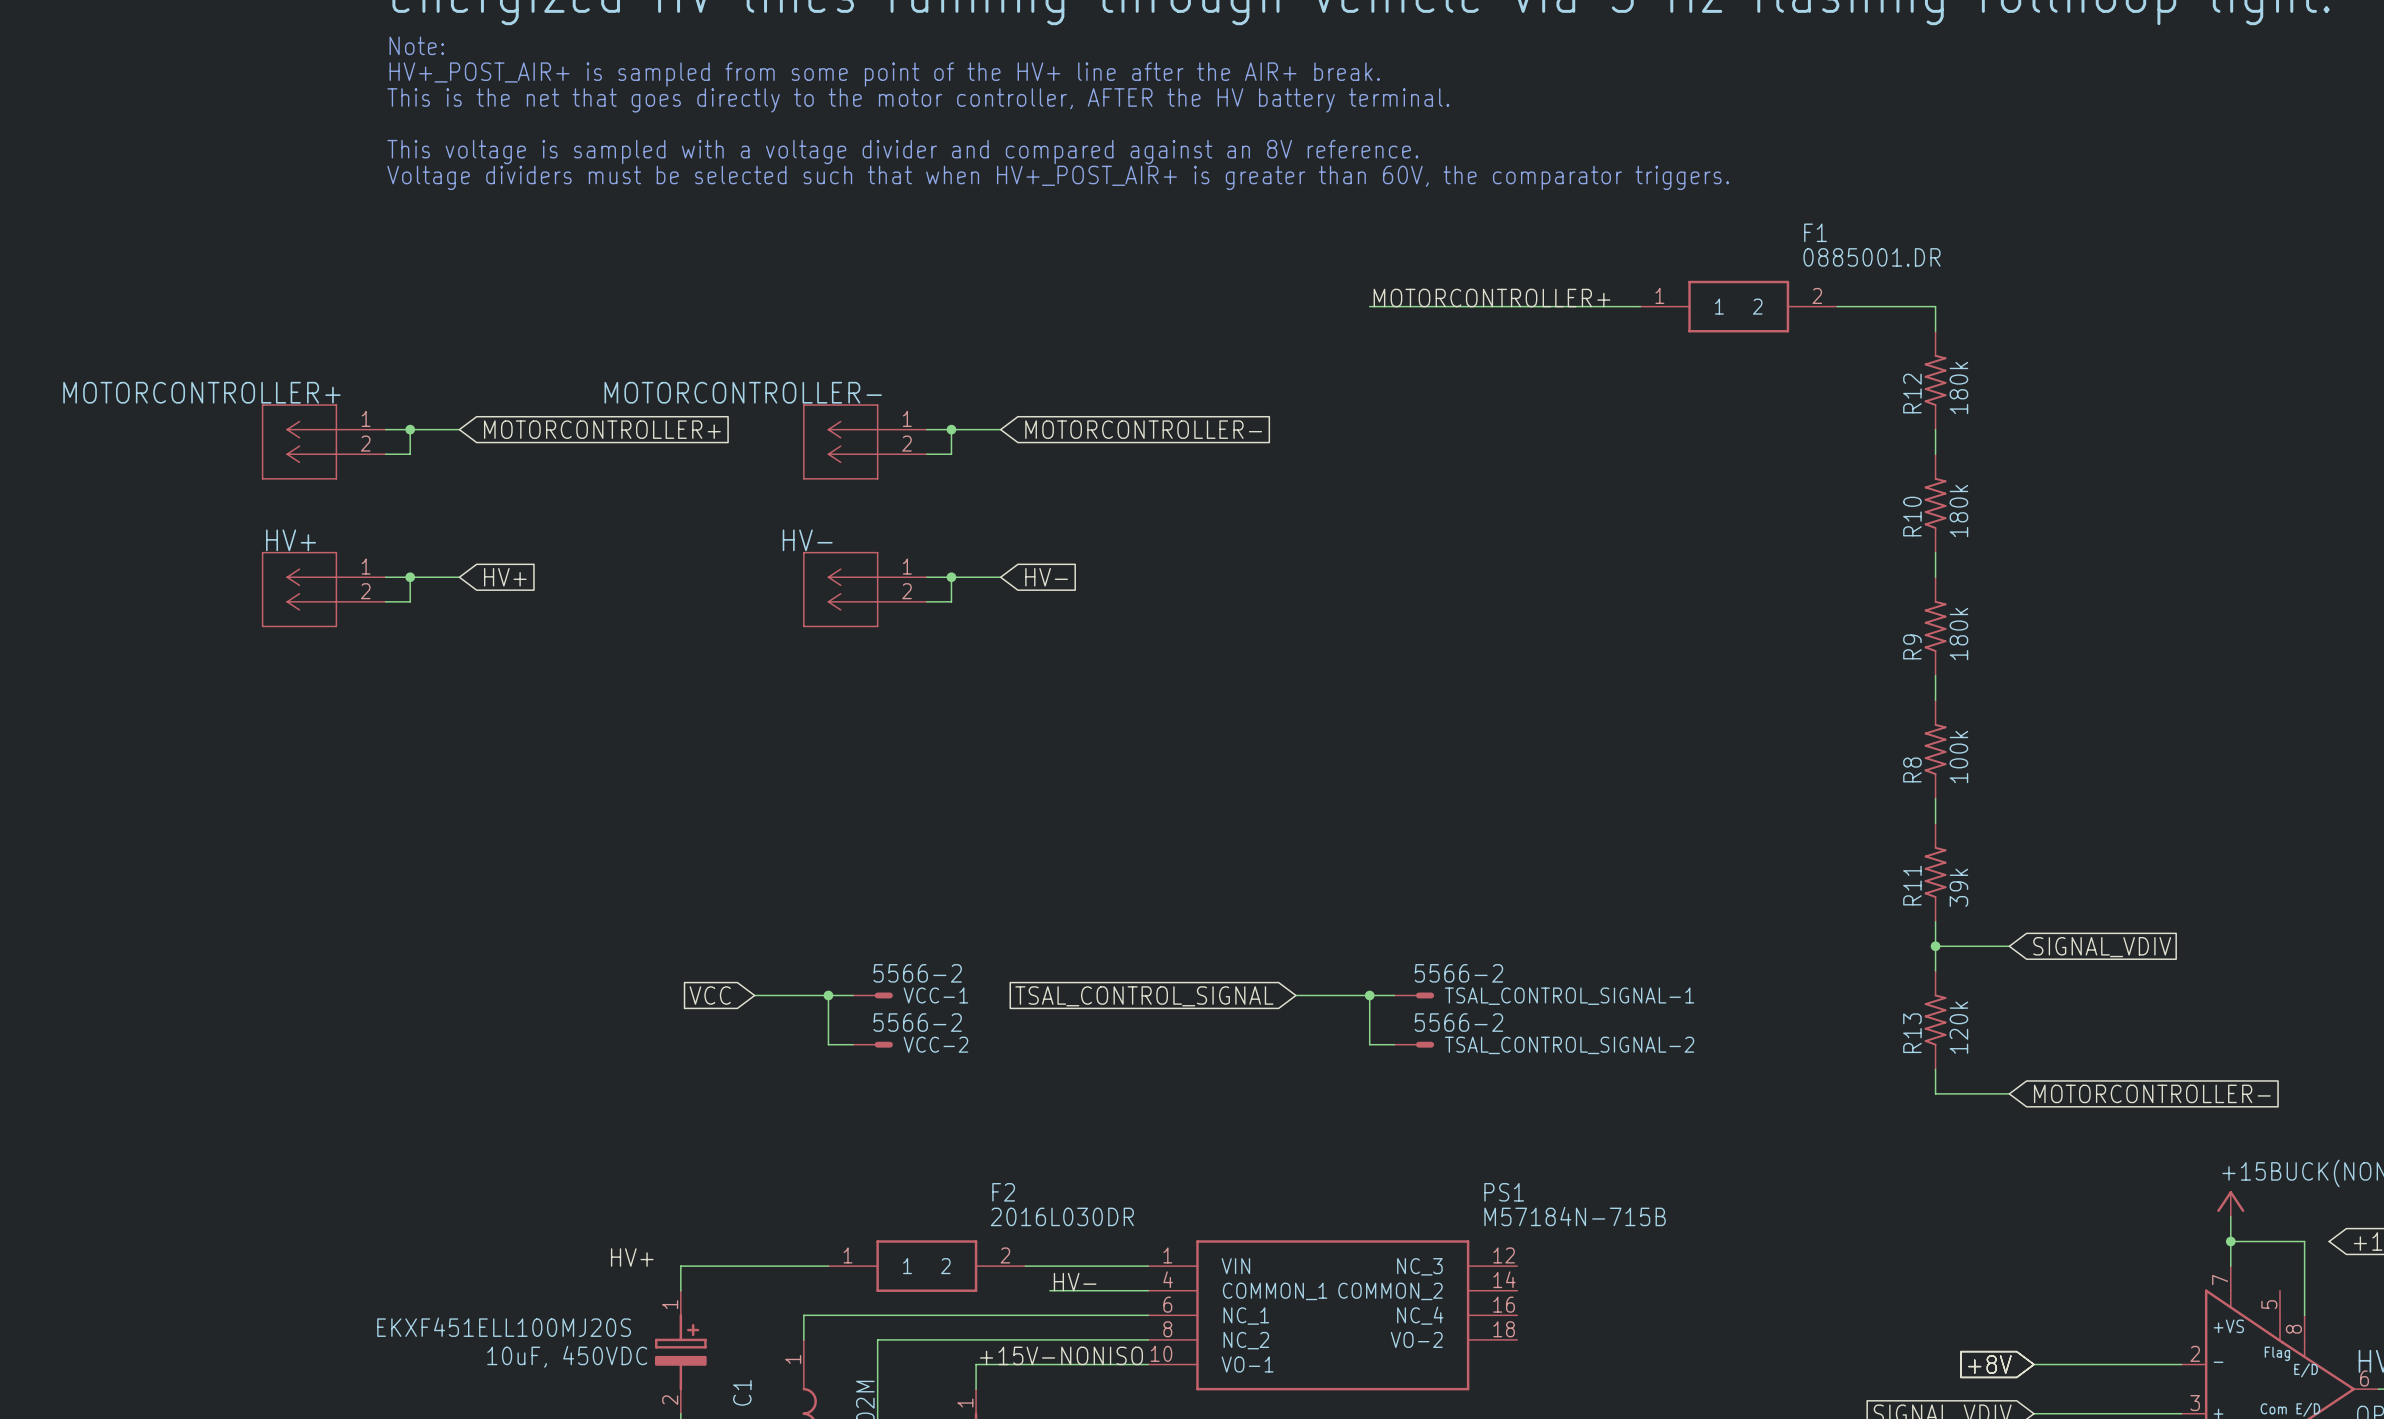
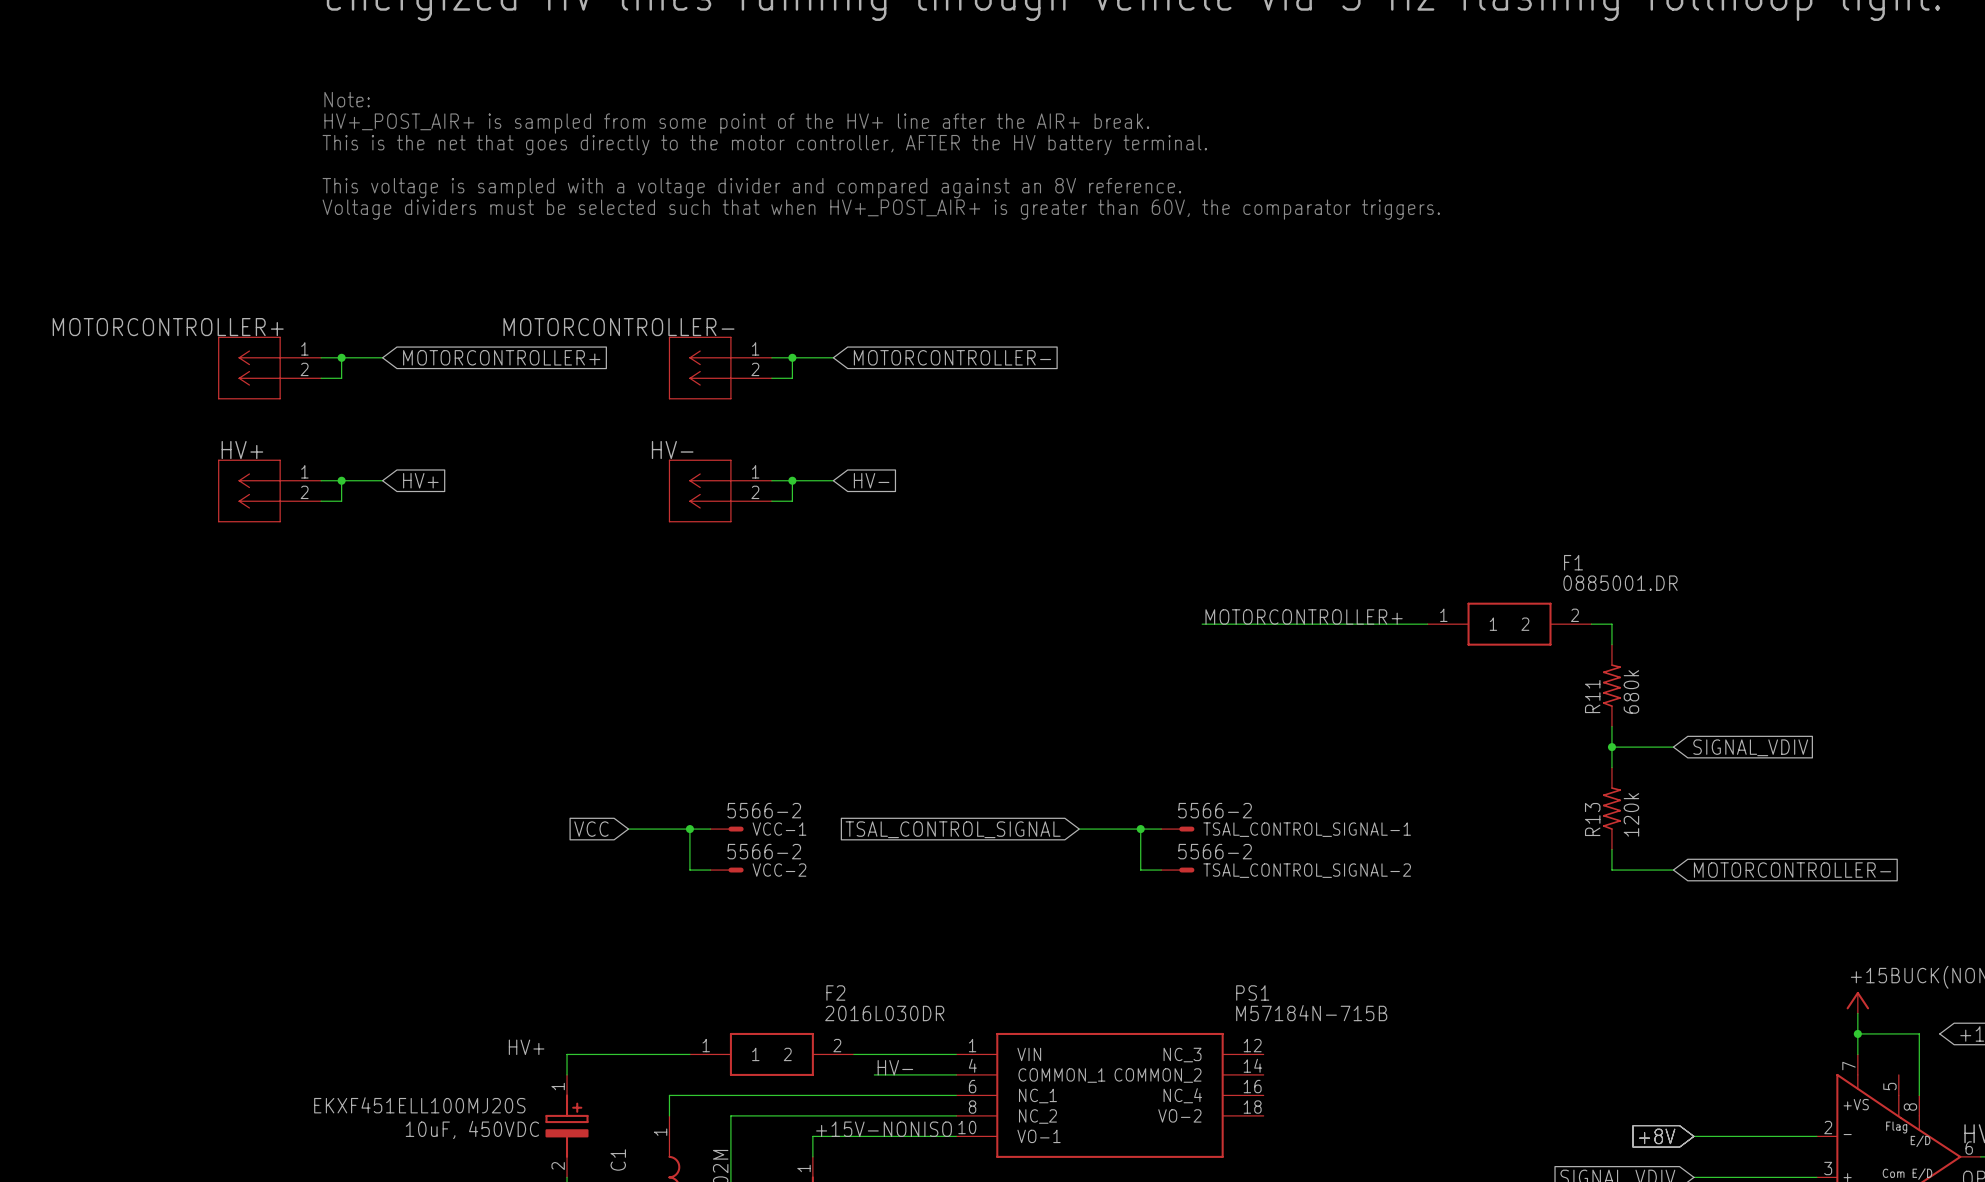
text position: Note: (416, 45) -> Note: (347, 99)
text position: HV+_POST_AIR+ is sampled from some point of the HV+ line after the AIR+ break. (884, 74) -> HV+_POST_AIR+ is sampled from some point of the HV+ line after the AIR+ break. (736, 123)
text position: This is the net that goes directly to the motor controller, AFTER the HV battery terminal. (918, 100) -> This is the net that goes directly to the motor controller, AFTER the HV battery terminal. (764, 145)
text position: This voltage is sampled with a voltage divider and compared against an 8V reference. (902, 152) -> This voltage is sampled with a voltage divider and compared against an 8V reference. (751, 188)
text position: Voltage dividers must be selected such that when HV+_POST_AIR+ is greater than 60V, the comparator triggers. (1058, 177) -> Voltage dividers must be selected such that when HV+_POST_AIR+ is greater than 60V, the comparator triggers. (881, 209)
label: MOTORCONTROLLER+ (1492, 298) -> none
wire: (1369, 306) (1640, 306) -> none
F1 position: (1738, 306) -> (1509, 624)
wire: (1837, 306) (1935, 306) (1935, 331) -> none
R12: 180k (1935, 380) -> none
wire: (1935, 429) (1935, 454) -> none
R10: 180k (1935, 503) -> none
wire: (1935, 552) (1935, 577) -> none
R9: 180k (1935, 626) -> none
wire: (1935, 675) (1935, 700) -> none
label: none -> MOTORCONTROLLER+ (1304, 617)
wire: none -> (1202, 624) (1427, 624)
wire: none -> (1591, 624) (1611, 624) (1611, 644)
R8: 100k (1935, 749) -> none
wire: (1935, 798) (1935, 823) -> none
R11 position: (1935, 872) -> (1611, 685)
R11 value: 39k (1958, 887) -> 680k (1631, 691)
wire: (1935, 946) (2009, 946) -> (1611, 747) (1673, 747)
junction position: (1935, 946) -> (1611, 747)
global label position: SIGNAL_VDIV (2102, 947) -> SIGNAL_VDIV (1750, 747)
R13 position: (1935, 1020) -> (1611, 808)
wire: (1935, 1069) (1935, 1093) (2009, 1093) -> (1611, 849) (1611, 870) (1673, 870)
global label position: MOTORCONTROLLER- (2152, 1093) -> MOTORCONTROLLER- (1792, 870)

